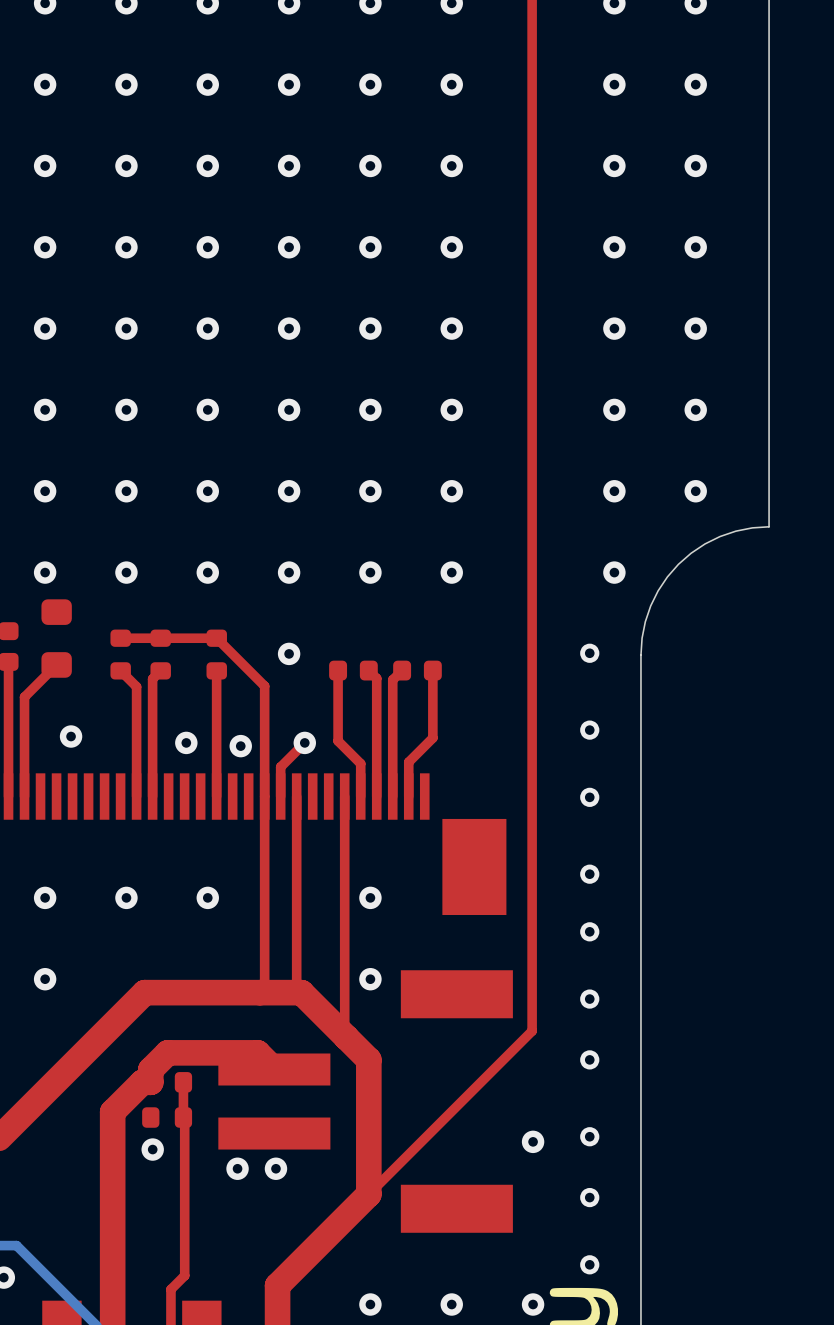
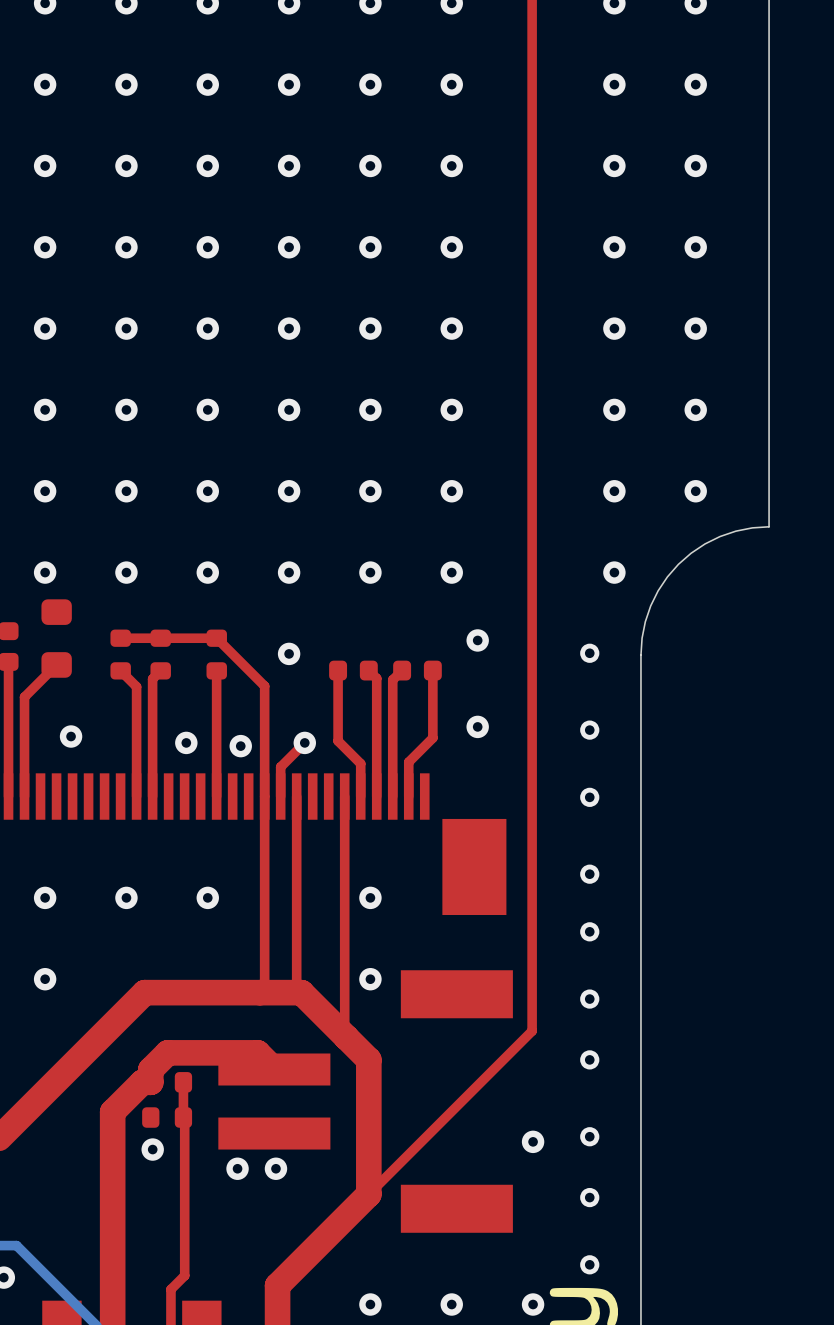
via: none -> (477, 640)
via: none -> (477, 726)

